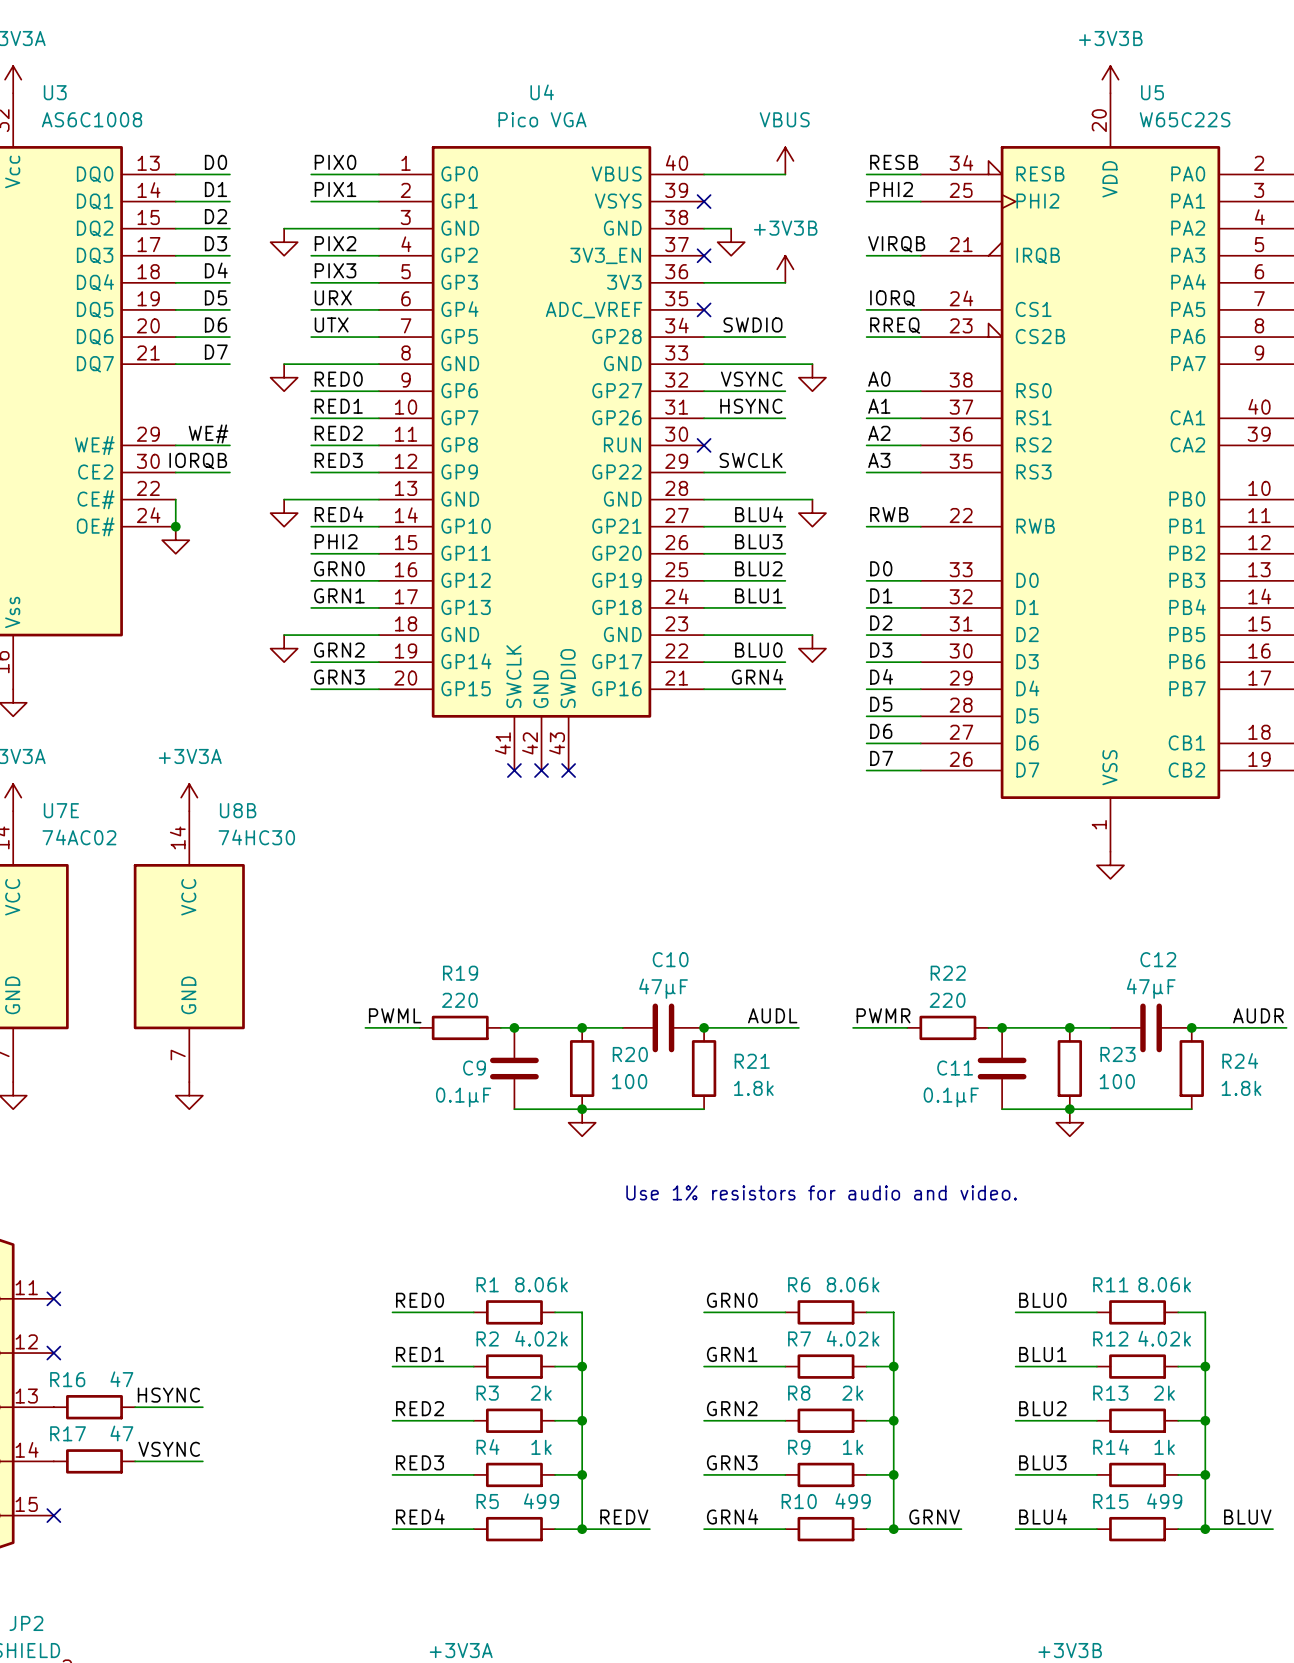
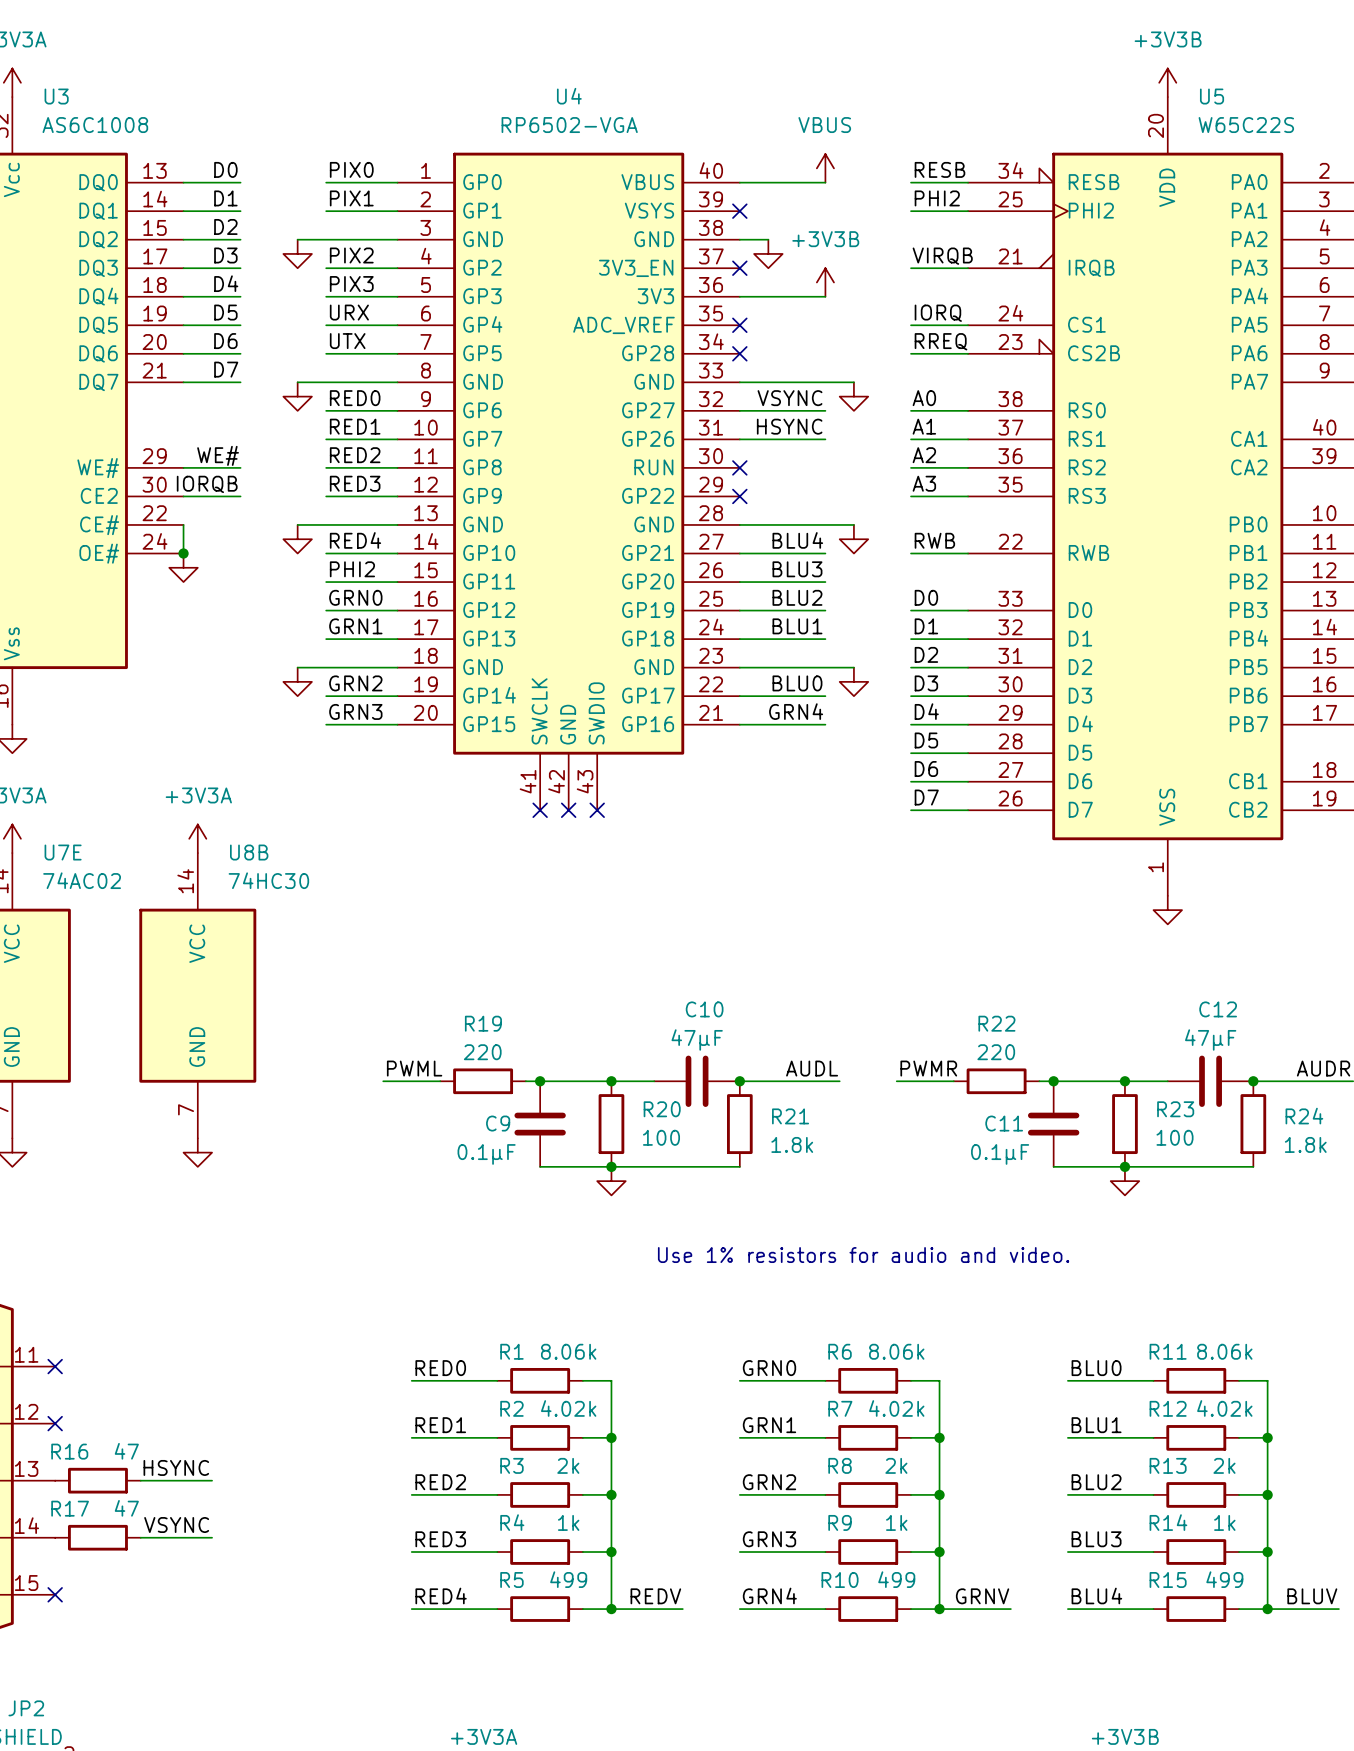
U4 value: Pico VGA (542, 119) -> RP6502-VGA (569, 125)
label: SWDIO (752, 324) -> none
wire: (704, 337) (785, 337) -> none
no-connect mark: none -> (739, 353)
label: SWCLK (751, 460) -> none
wire: (704, 472) (785, 472) -> none
no-connect mark: none -> (739, 496)

